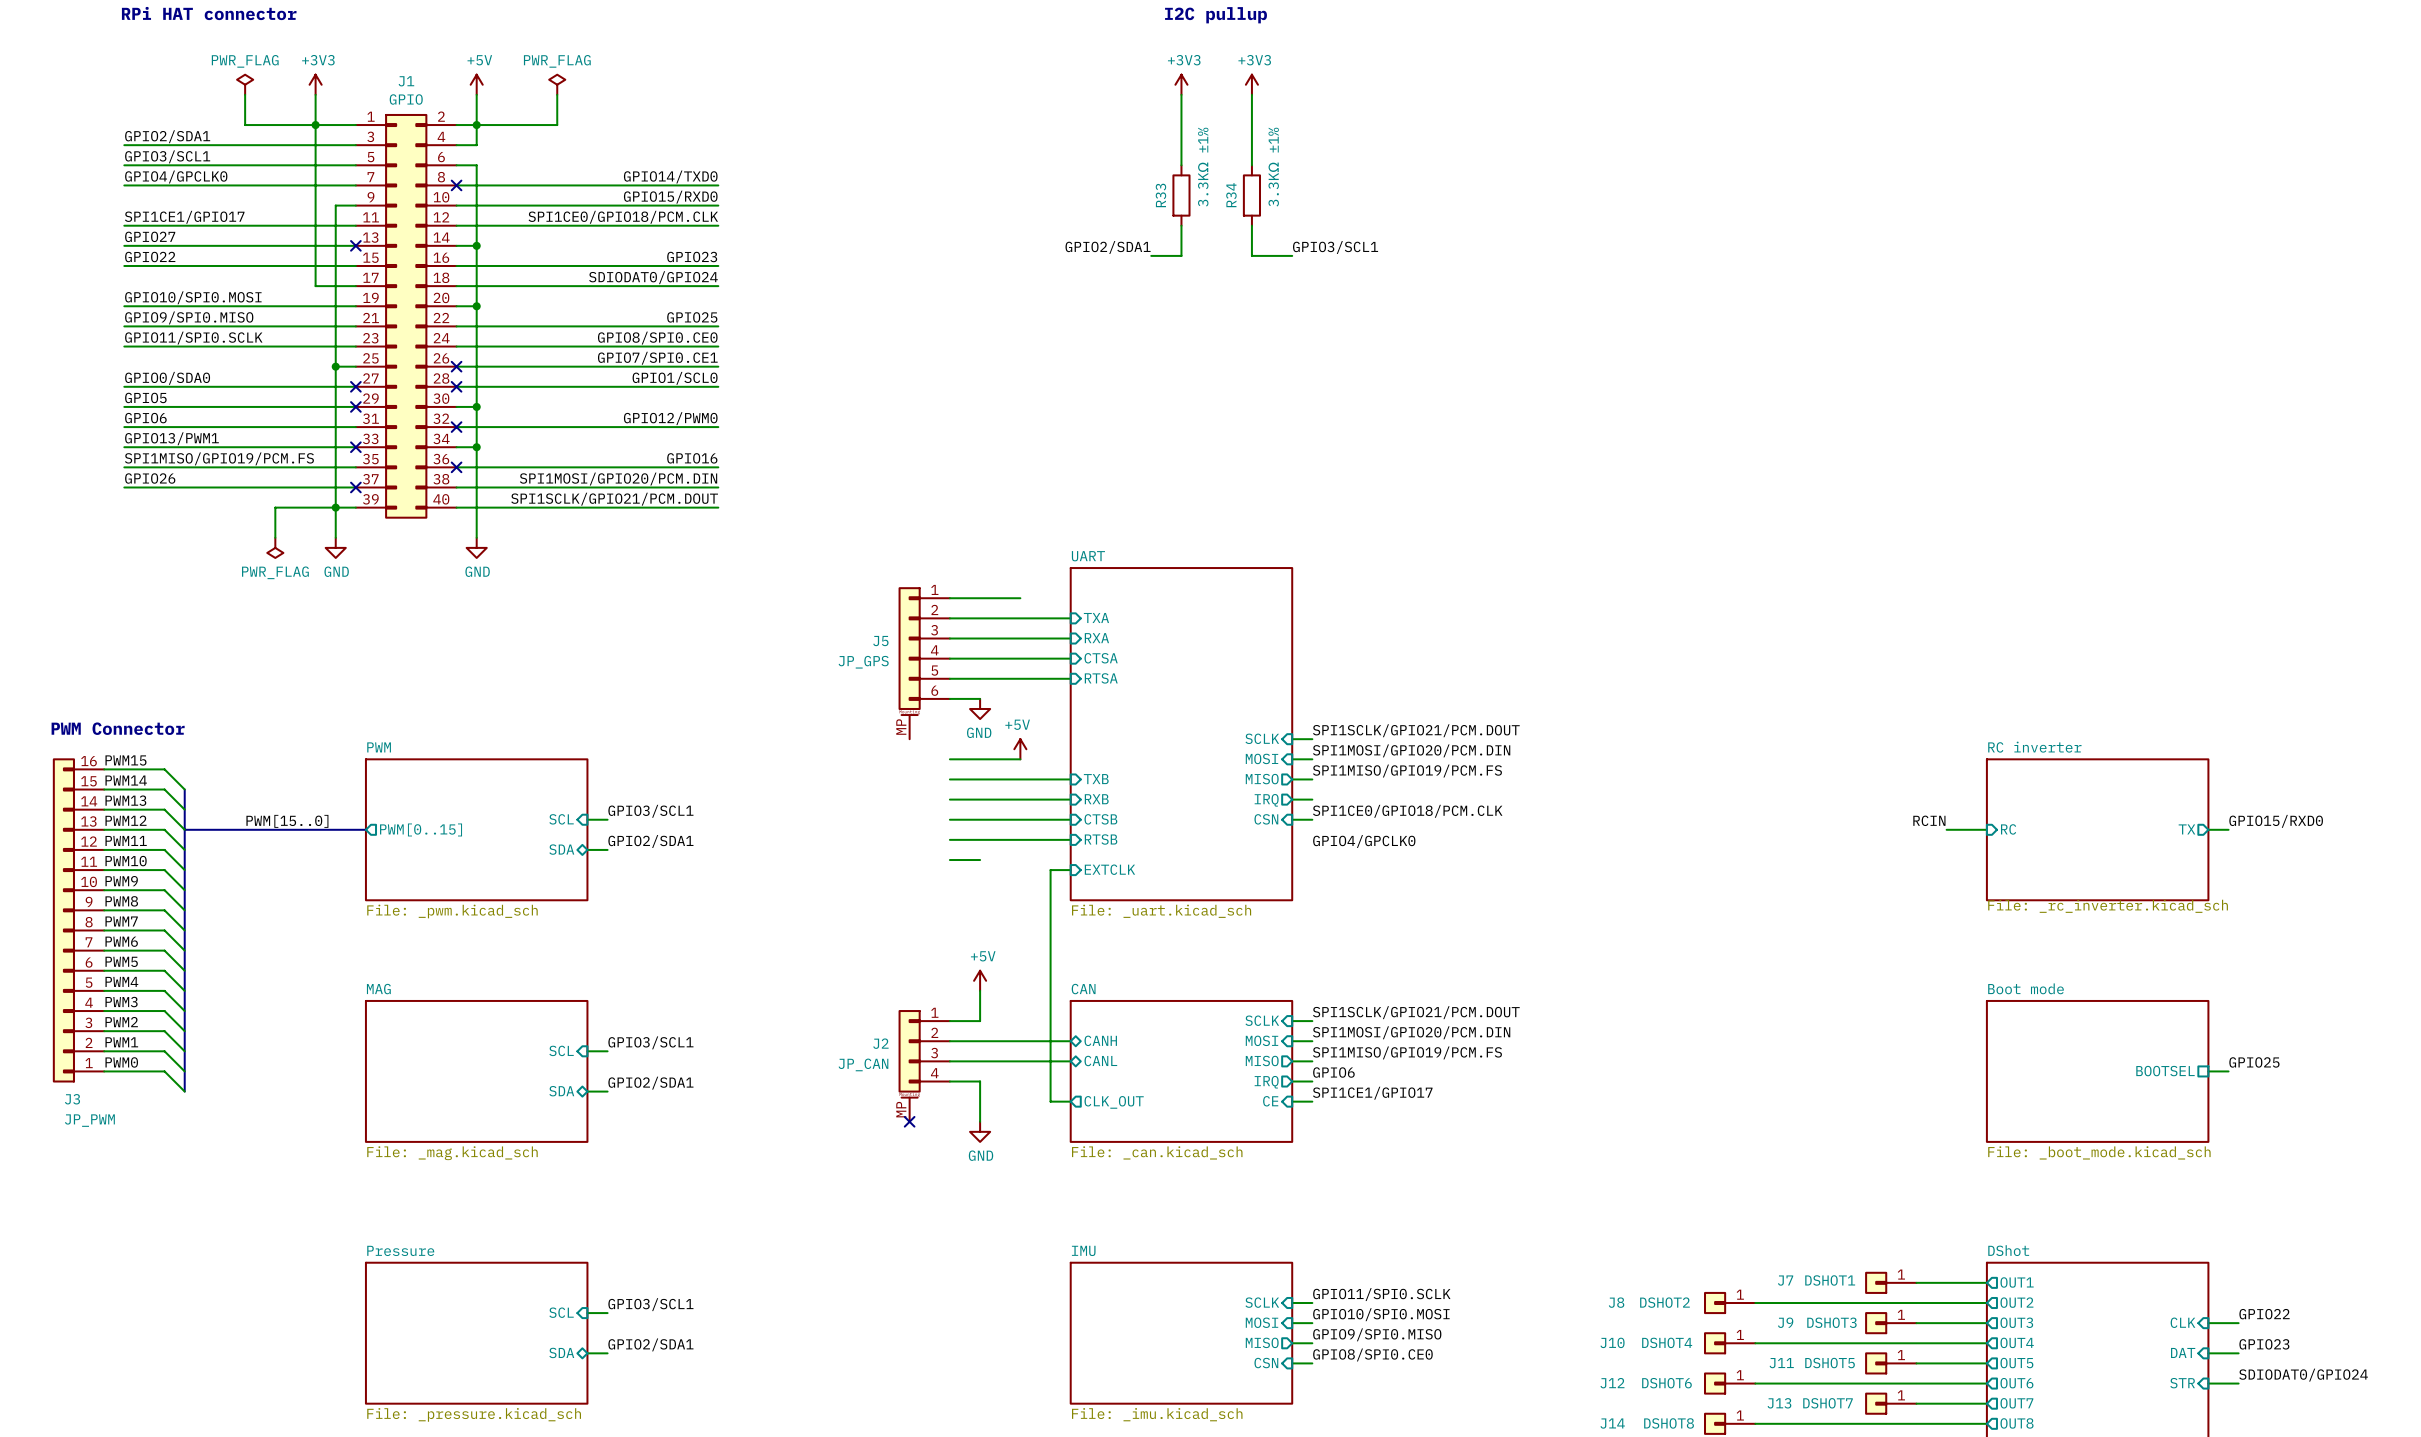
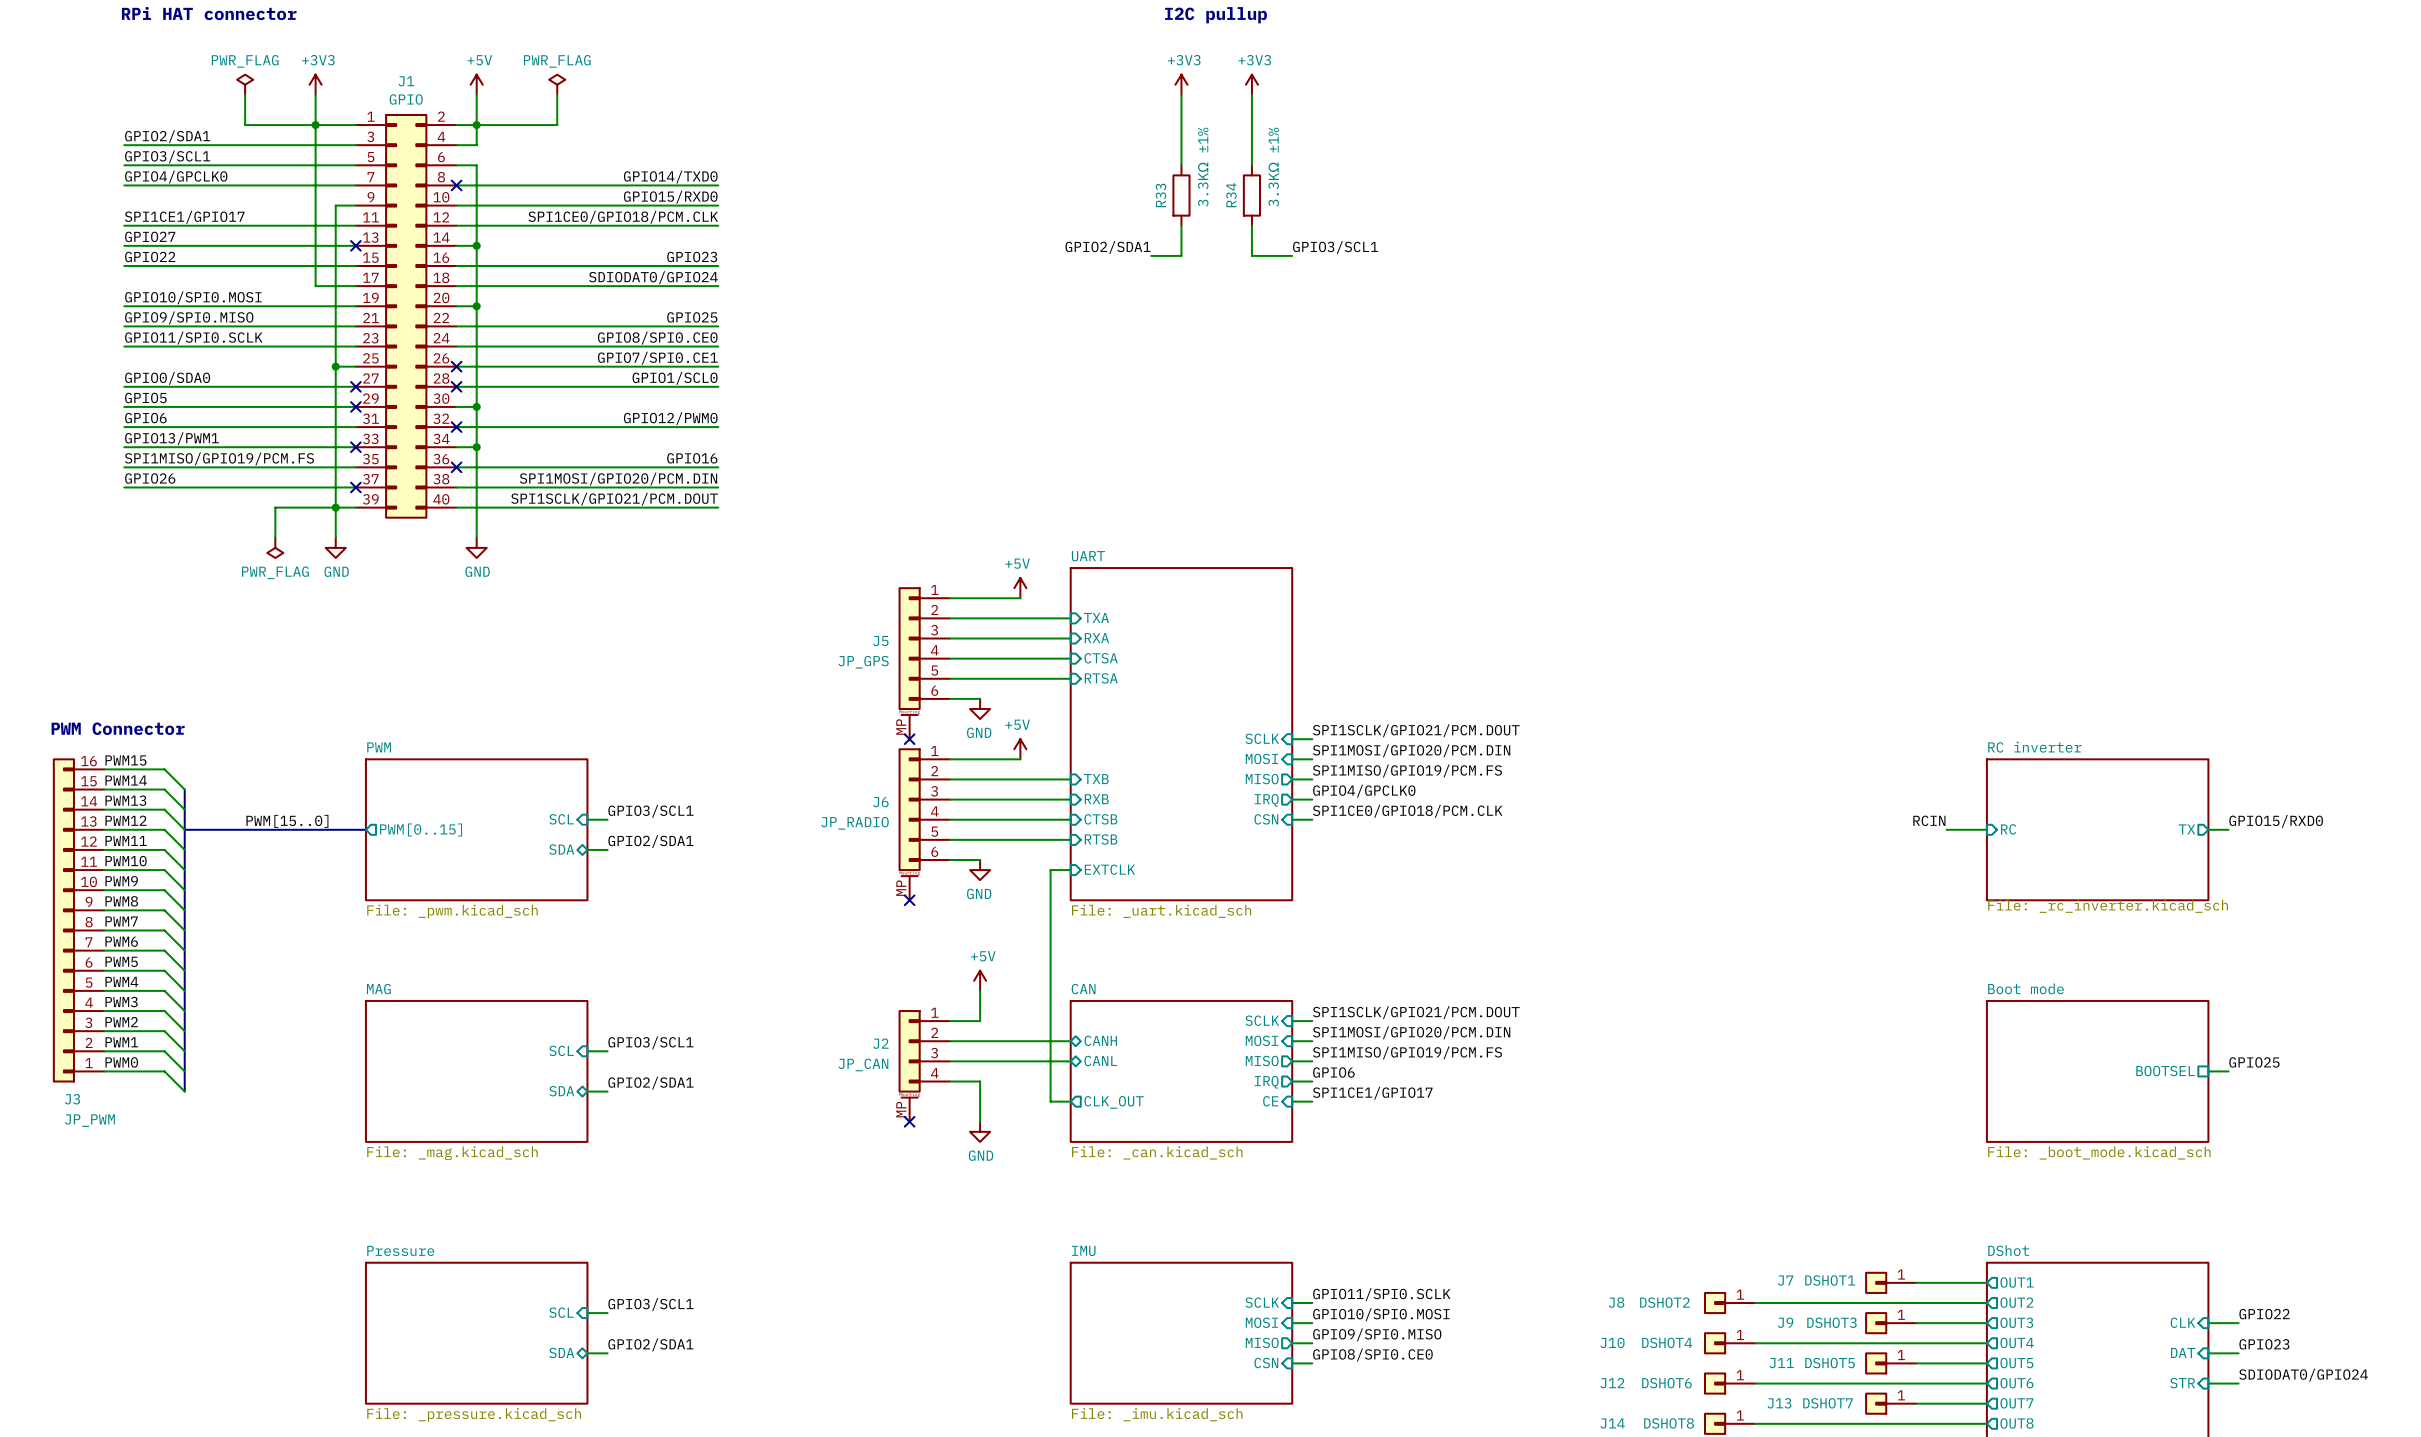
power symbol: none -> +5V (1020, 588)
no-connect mark: none -> (909, 739)
J6: none -> JP_RADIO (924, 824)
label position: GPIO4/GPCLK0 (1364, 841) -> GPIO4/GPCLK0 (1364, 791)
power symbol: none -> GND (980, 870)
no-connect mark: none -> (909, 900)

